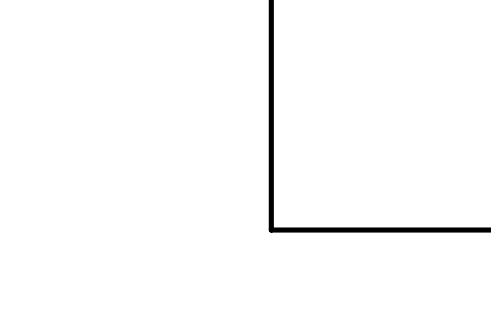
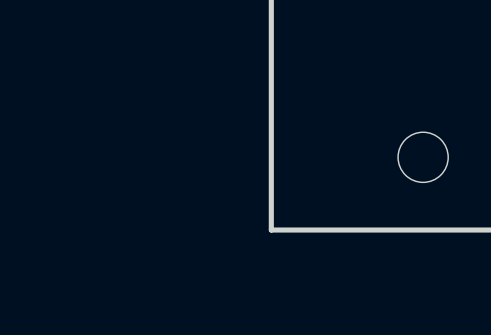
round board edge: none -> [397, 131, 449, 184]

